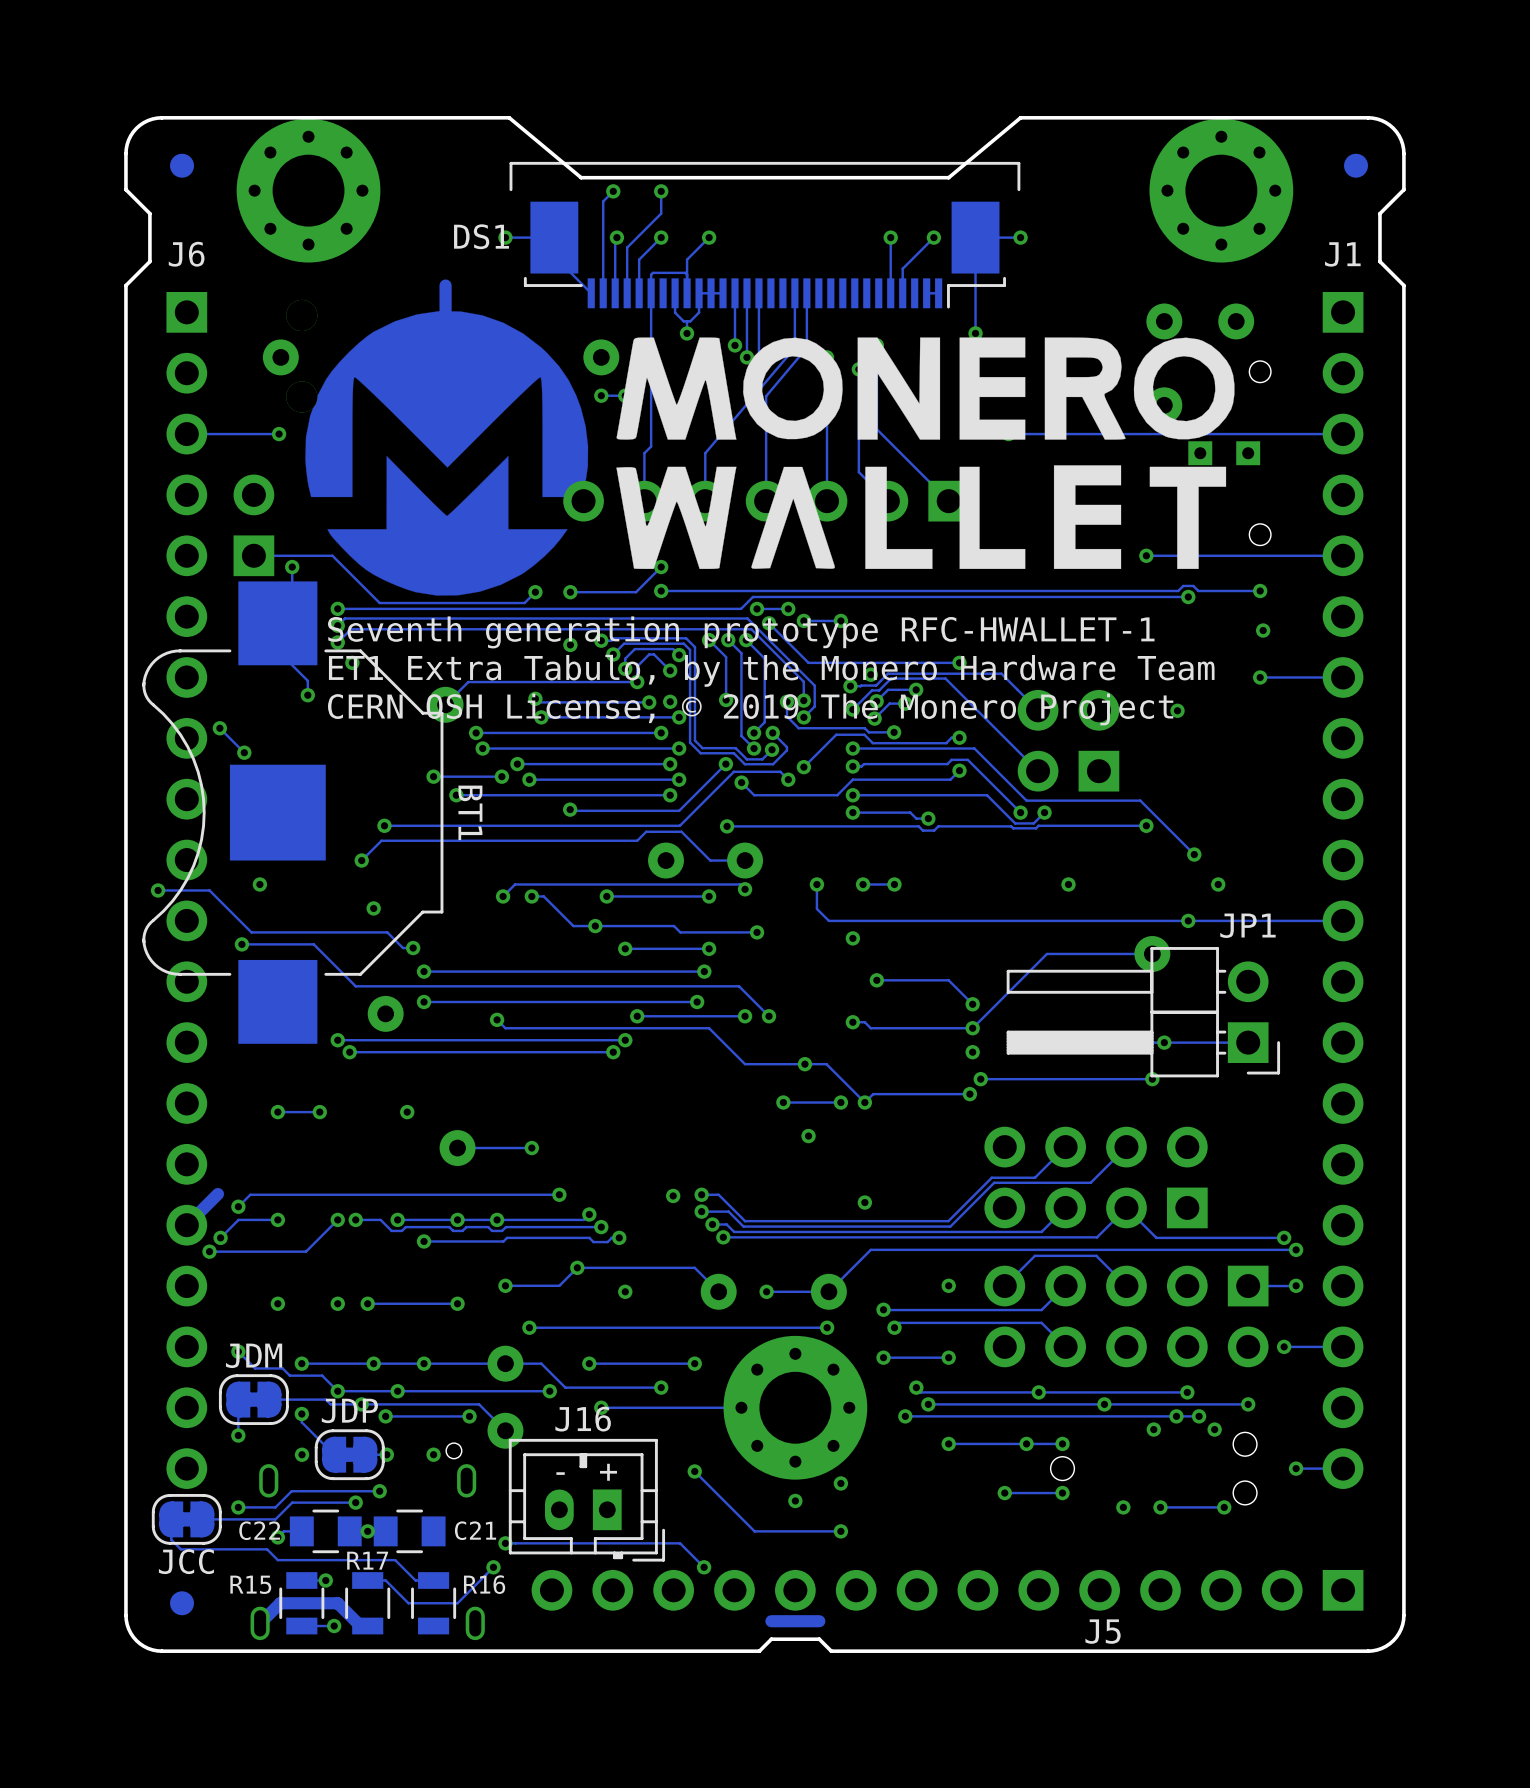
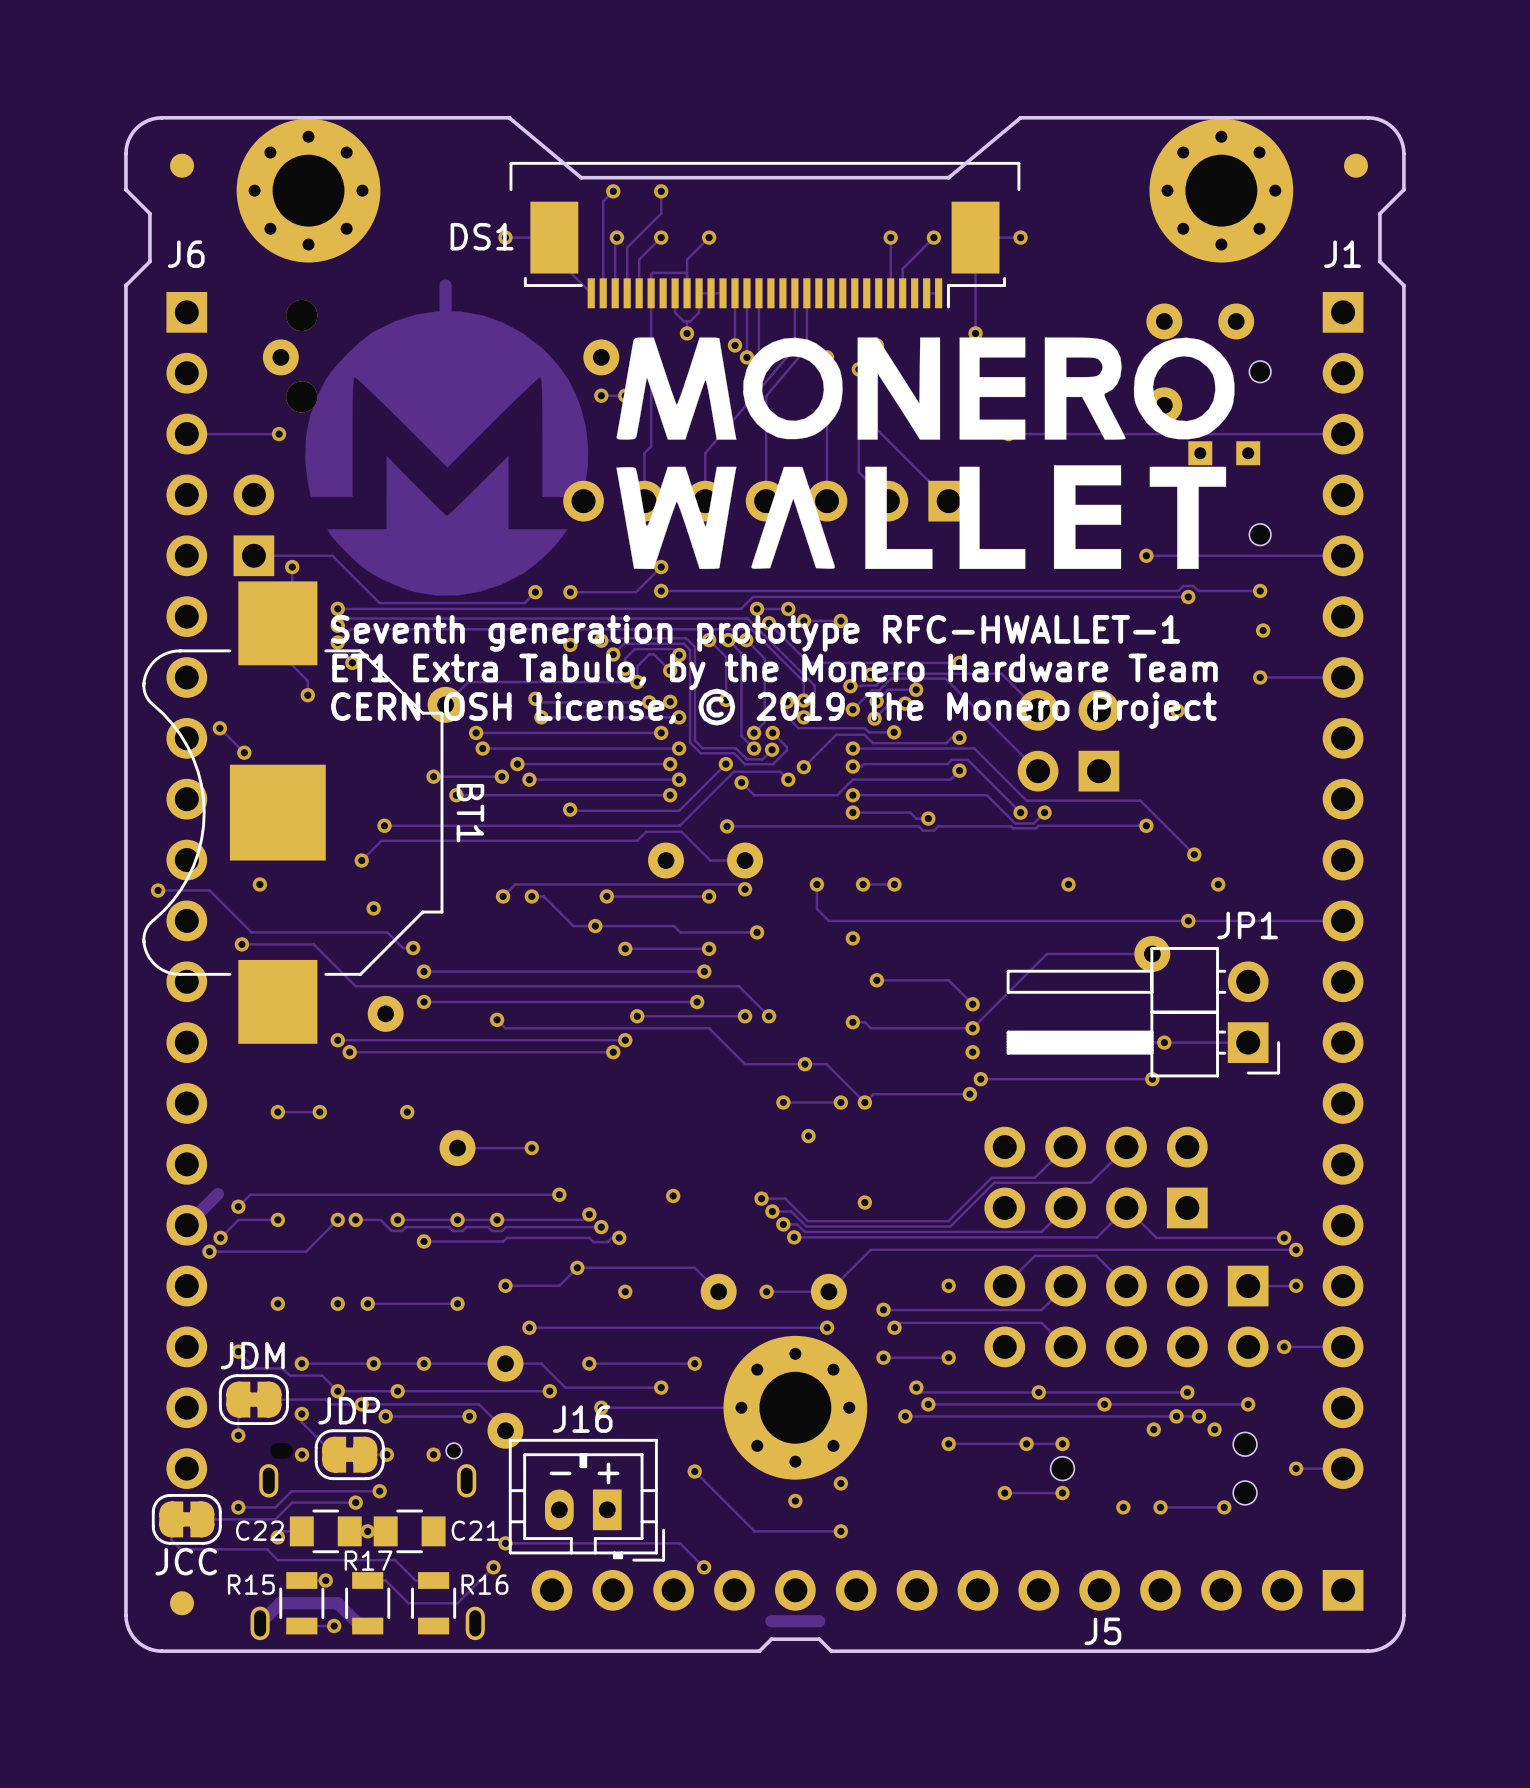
track: (701, 1194) (718, 1194) (745, 1221) (807, 1221) -> (761, 1198) (785, 1198) (807, 1221)
via: (701, 1194) -> none
via: none -> (761, 1198)
track: (701, 1211) (728, 1211) (743, 1226) (806, 1226) -> (772, 1211) (791, 1211) (806, 1226)
via: (701, 1211) -> none
via: none -> (772, 1211)
track: (712, 1224) (726, 1224) (734, 1231) (804, 1231) -> (783, 1224) (797, 1224) (804, 1231)
via: (712, 1224) -> none
via: none -> (783, 1224)
via: (723, 1237) -> none
track: (794, 1237) (723, 1237) -> none
via: none -> (794, 1237)

